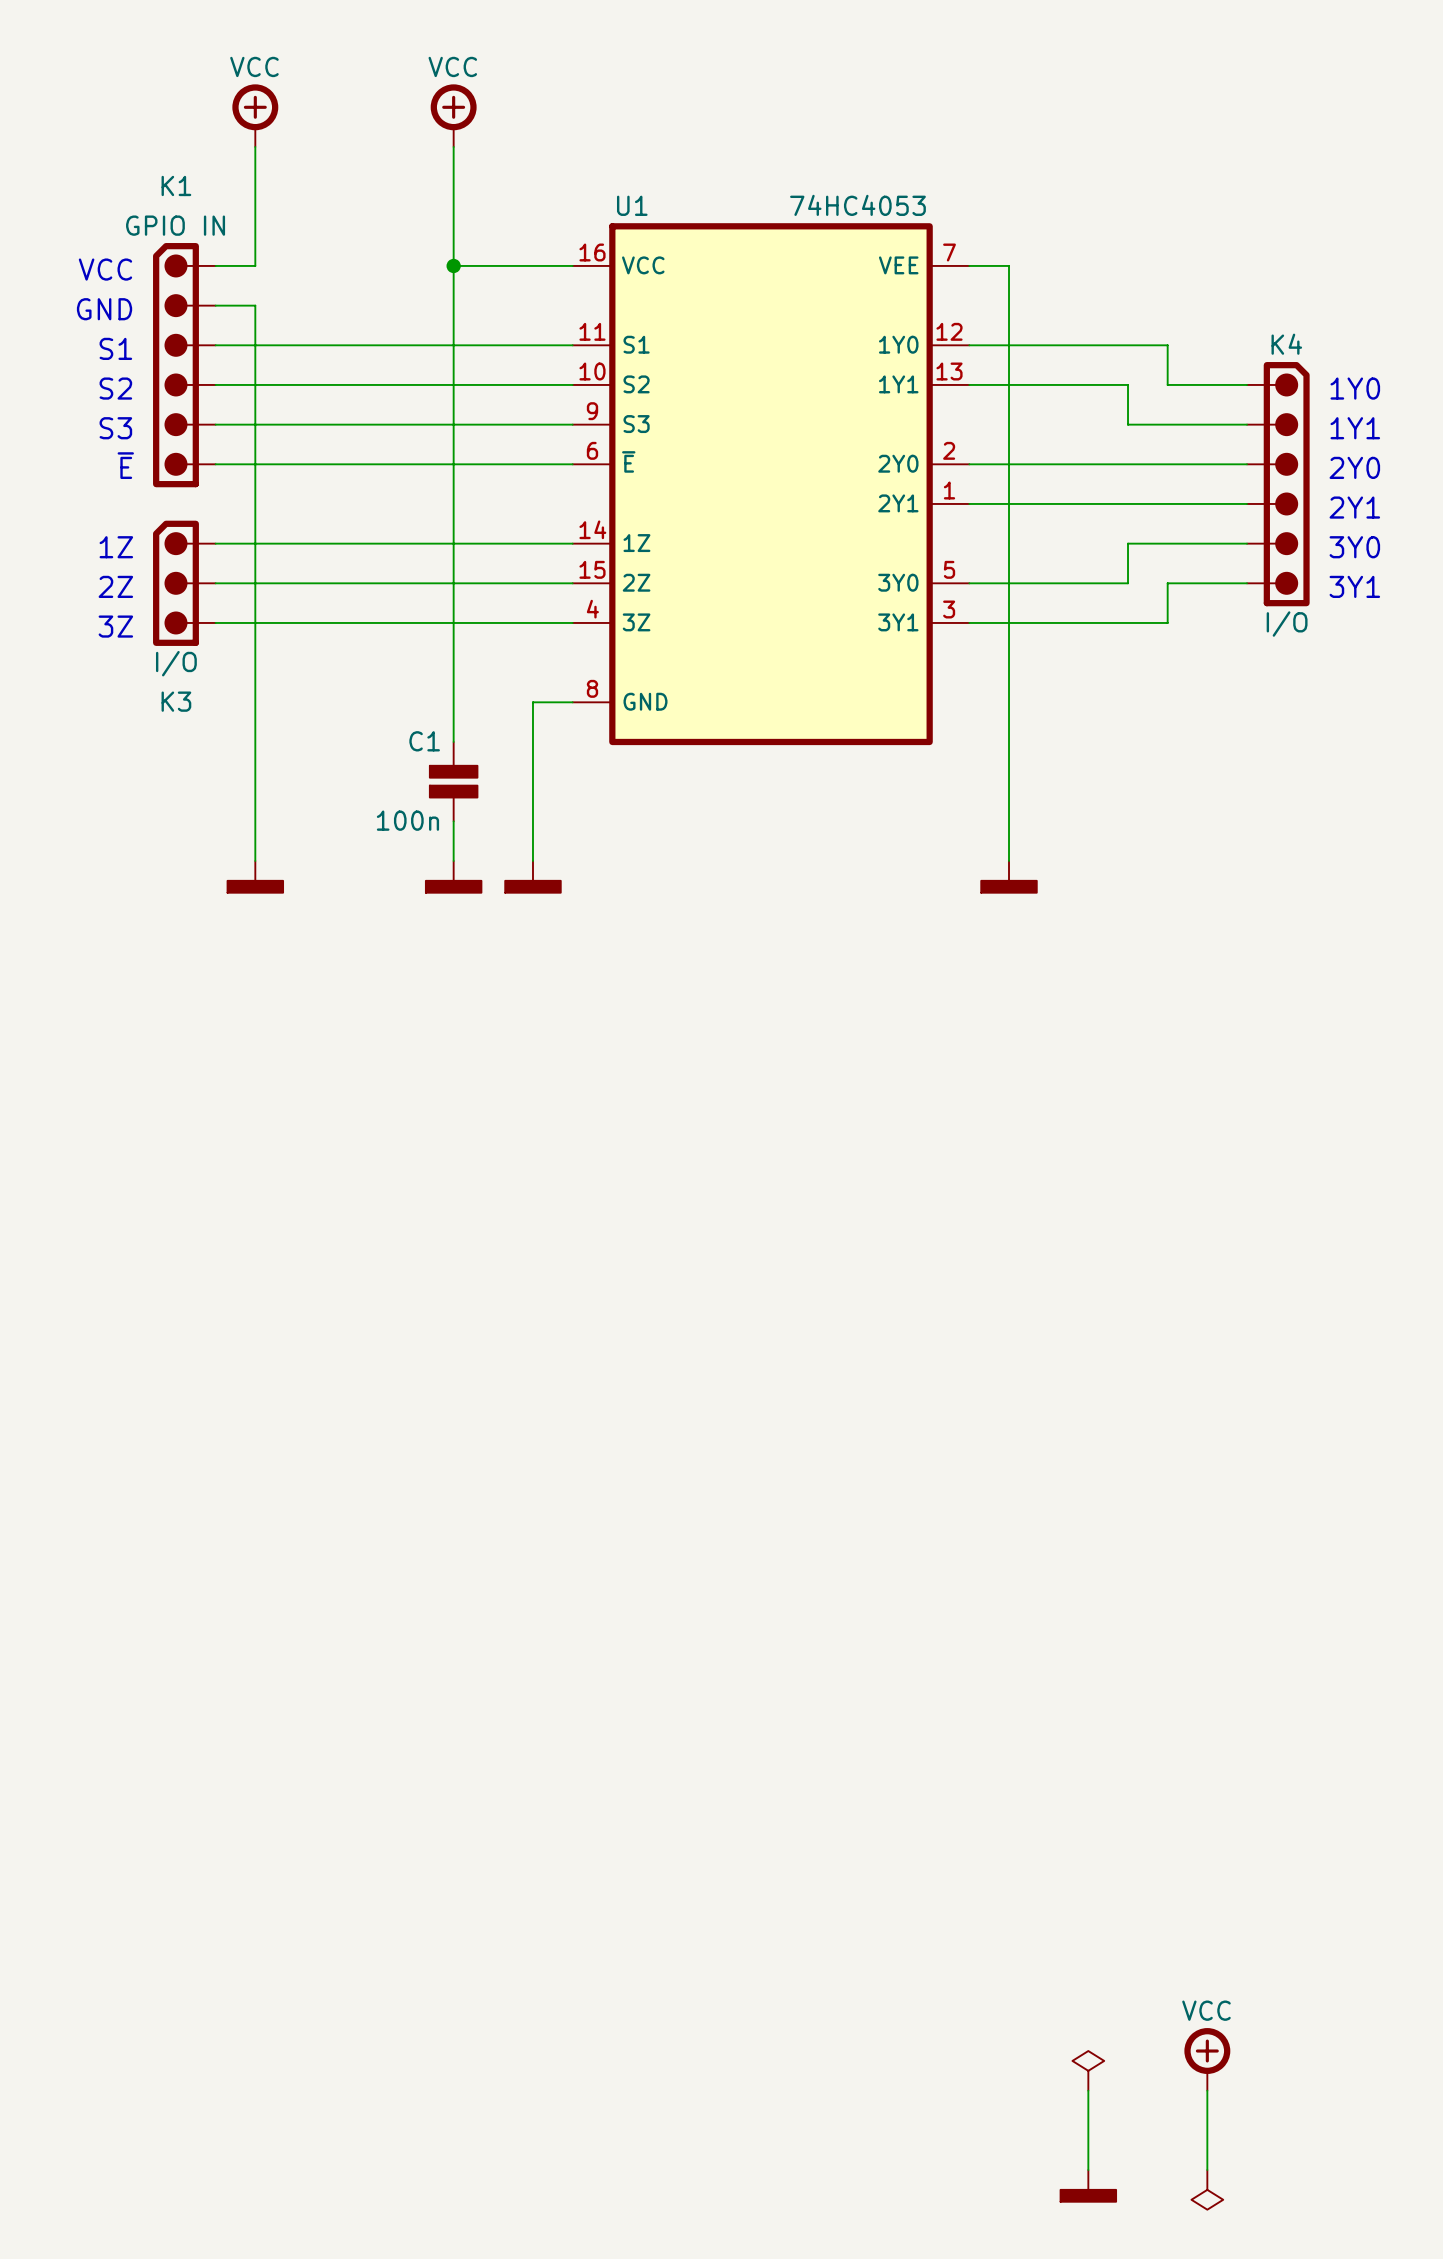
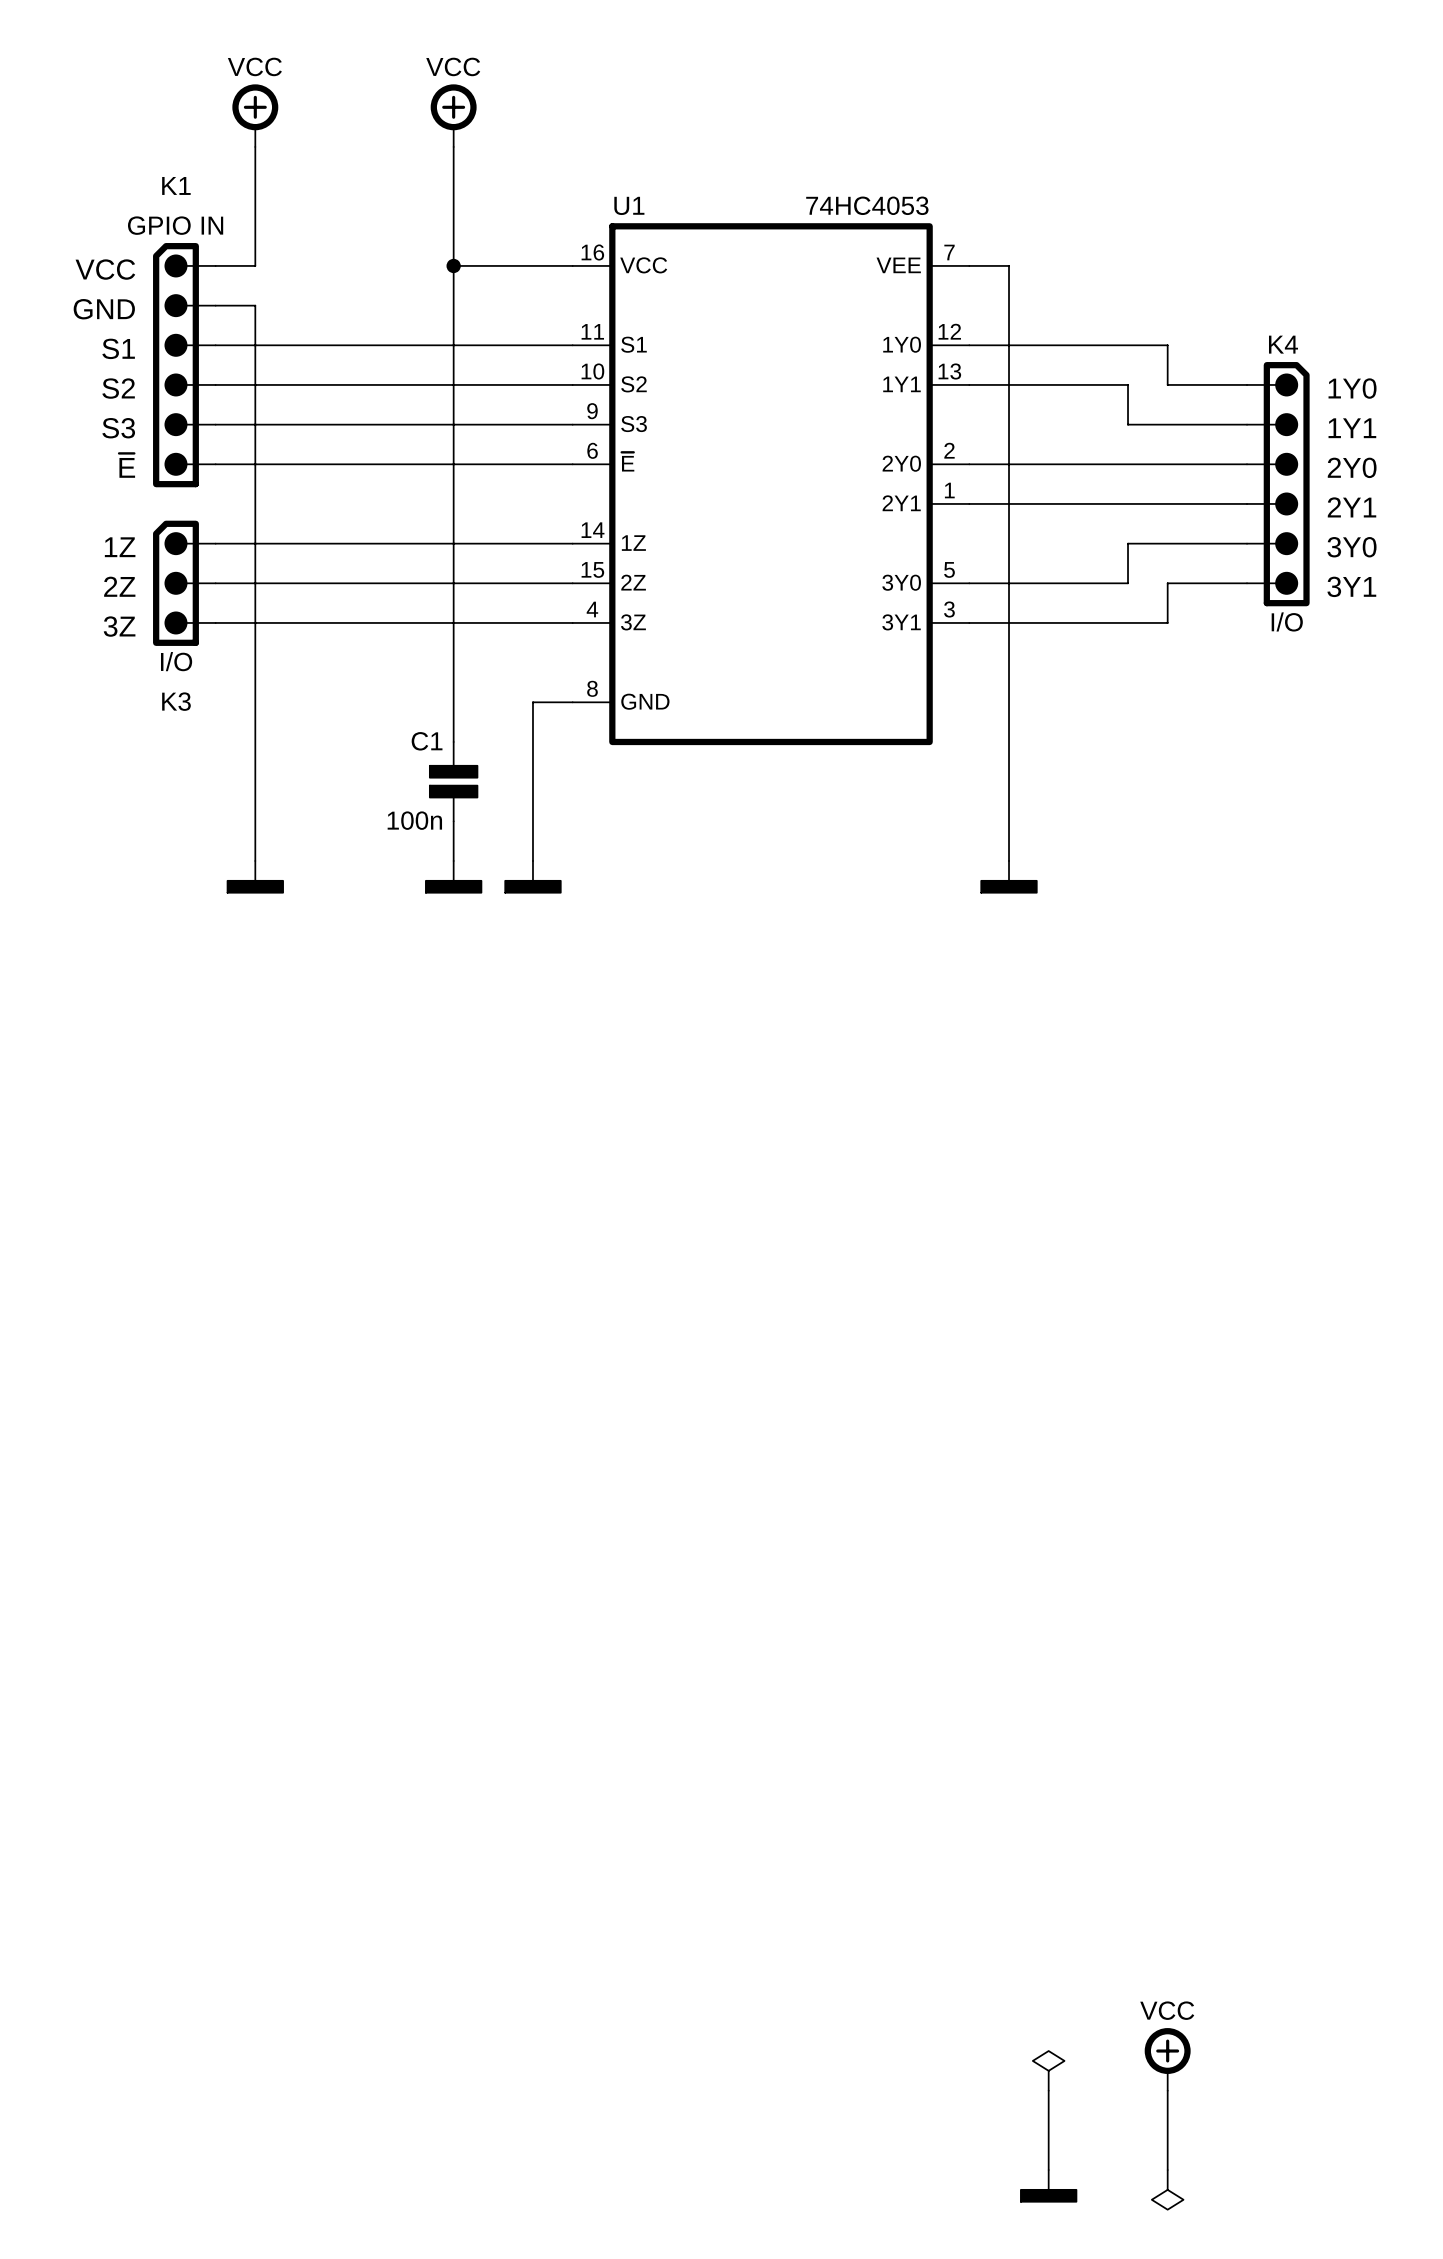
power symbol position: (1207, 2059) -> (1167, 2059)
power symbol position: (1088, 2070) -> (1048, 2070)
wire: (1088, 2090) (1088, 2170) -> (1048, 2090) (1048, 2170)
wire: (1207, 2090) (1207, 2170) -> (1167, 2090) (1167, 2170)
power symbol position: (1088, 2185) -> (1048, 2185)
power symbol position: (1207, 2189) -> (1167, 2189)

